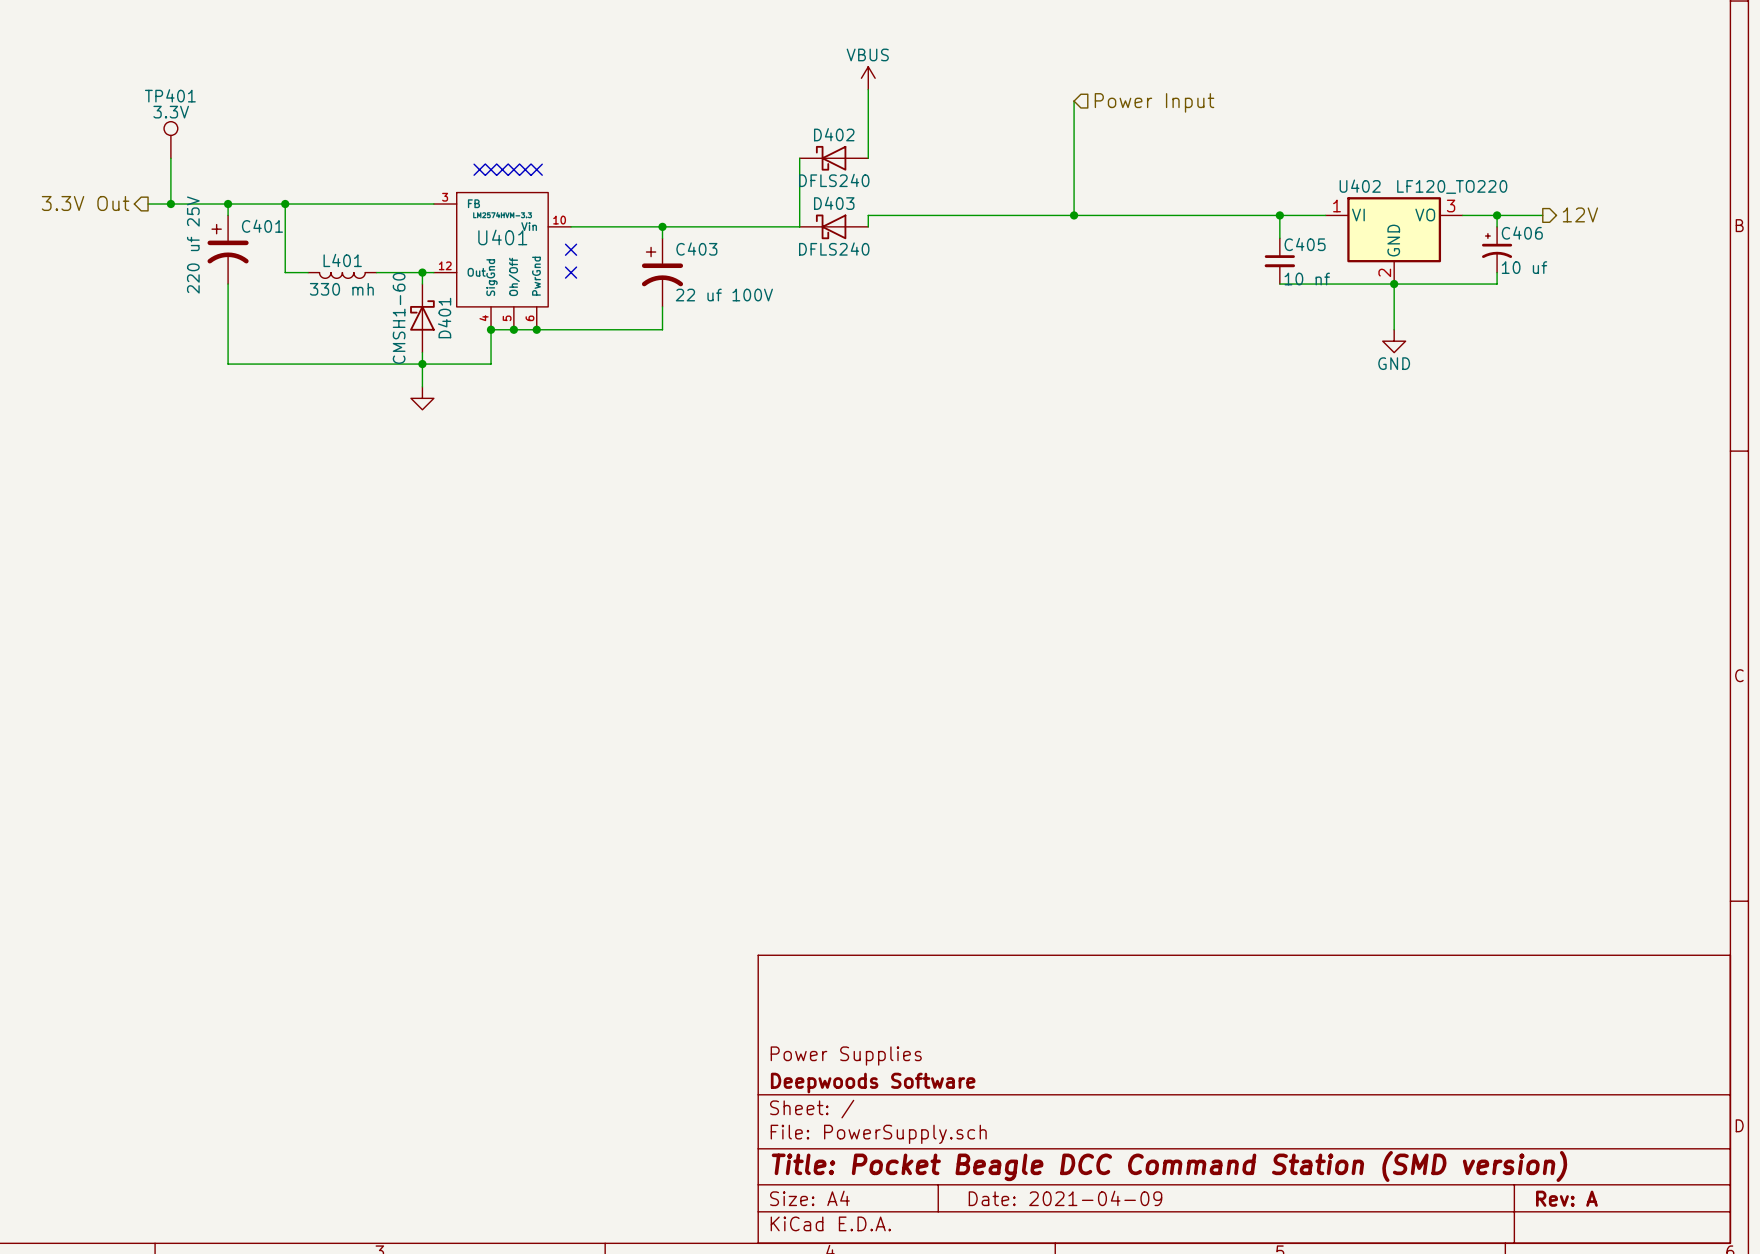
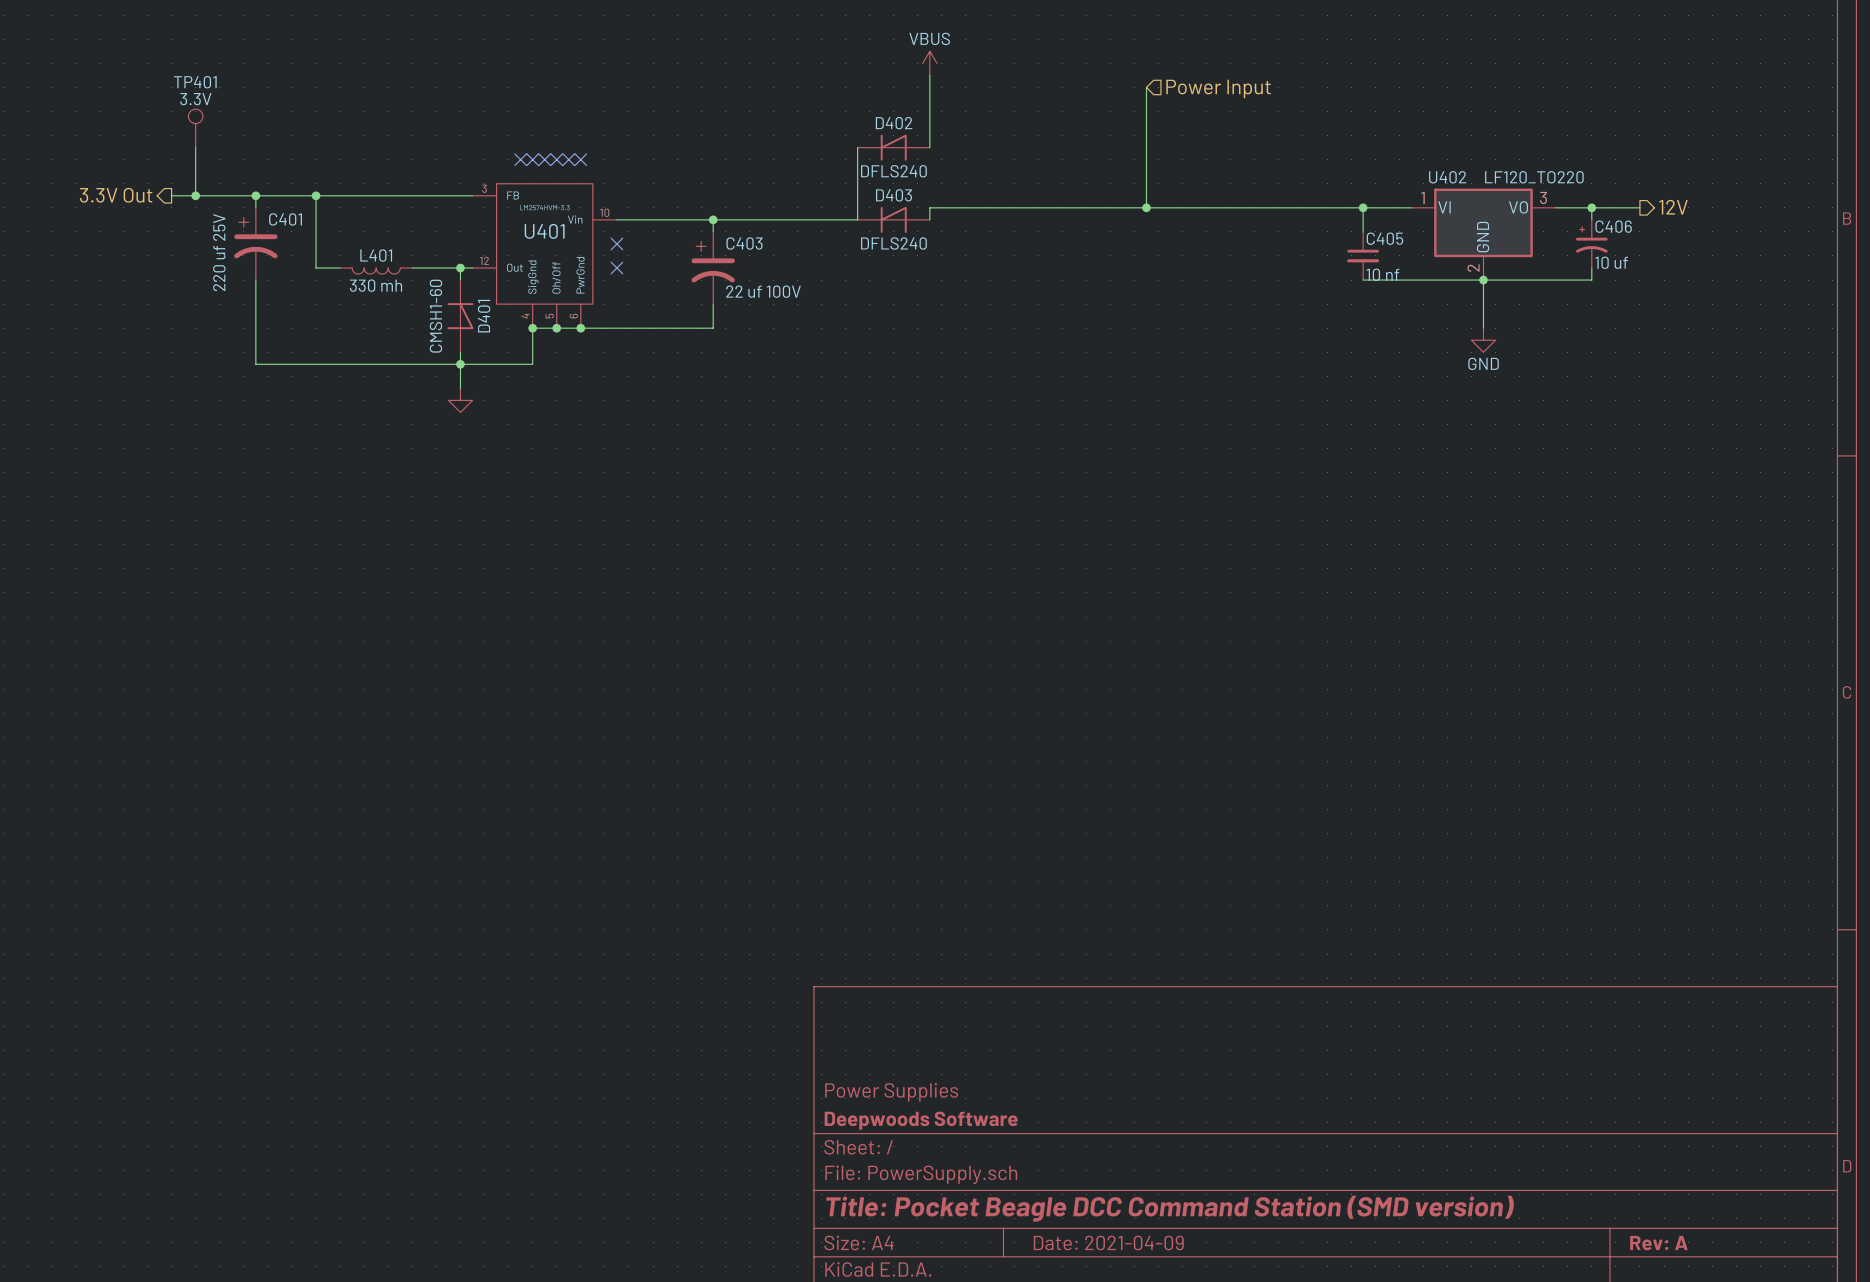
D402 symbol: [799, 145, 869, 171] -> [857, 134, 930, 161]
D403 symbol: [799, 214, 869, 240] -> [857, 206, 930, 233]
D401 symbol: [410, 284, 435, 353] -> [447, 280, 474, 353]

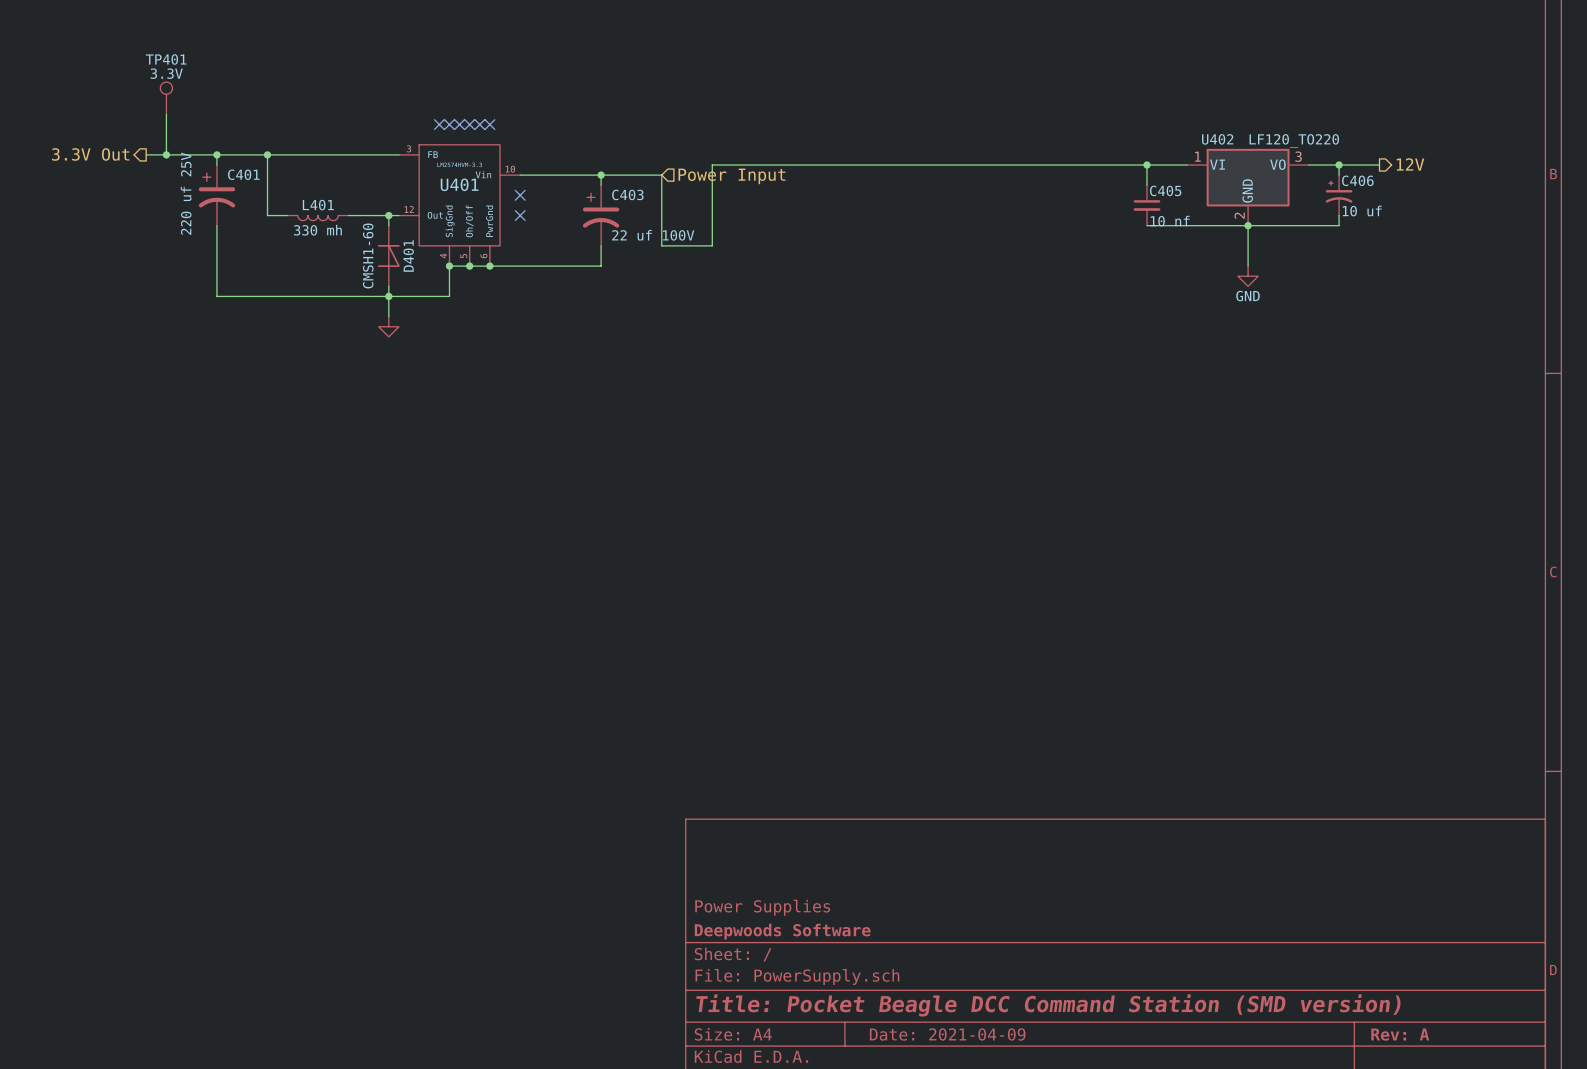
power symbol: VBUS (929, 63) -> none
wire: (929, 75) (929, 147) -> none
wire: (1146, 87) (1146, 207) -> none
hierarchical label: Power Input (1218, 88) -> none
wire: (857, 147) (857, 219) (785, 219) -> (783, 165) (712, 165) (712, 245) (661, 245) (661, 175)
D402: DFLS240 (893, 147) -> none
wire: (929, 207) (929, 219) -> none
junction: (1146, 207) -> none
D403: DFLS240 (893, 219) -> none
hierarchical label: none -> Power Input (732, 176)

